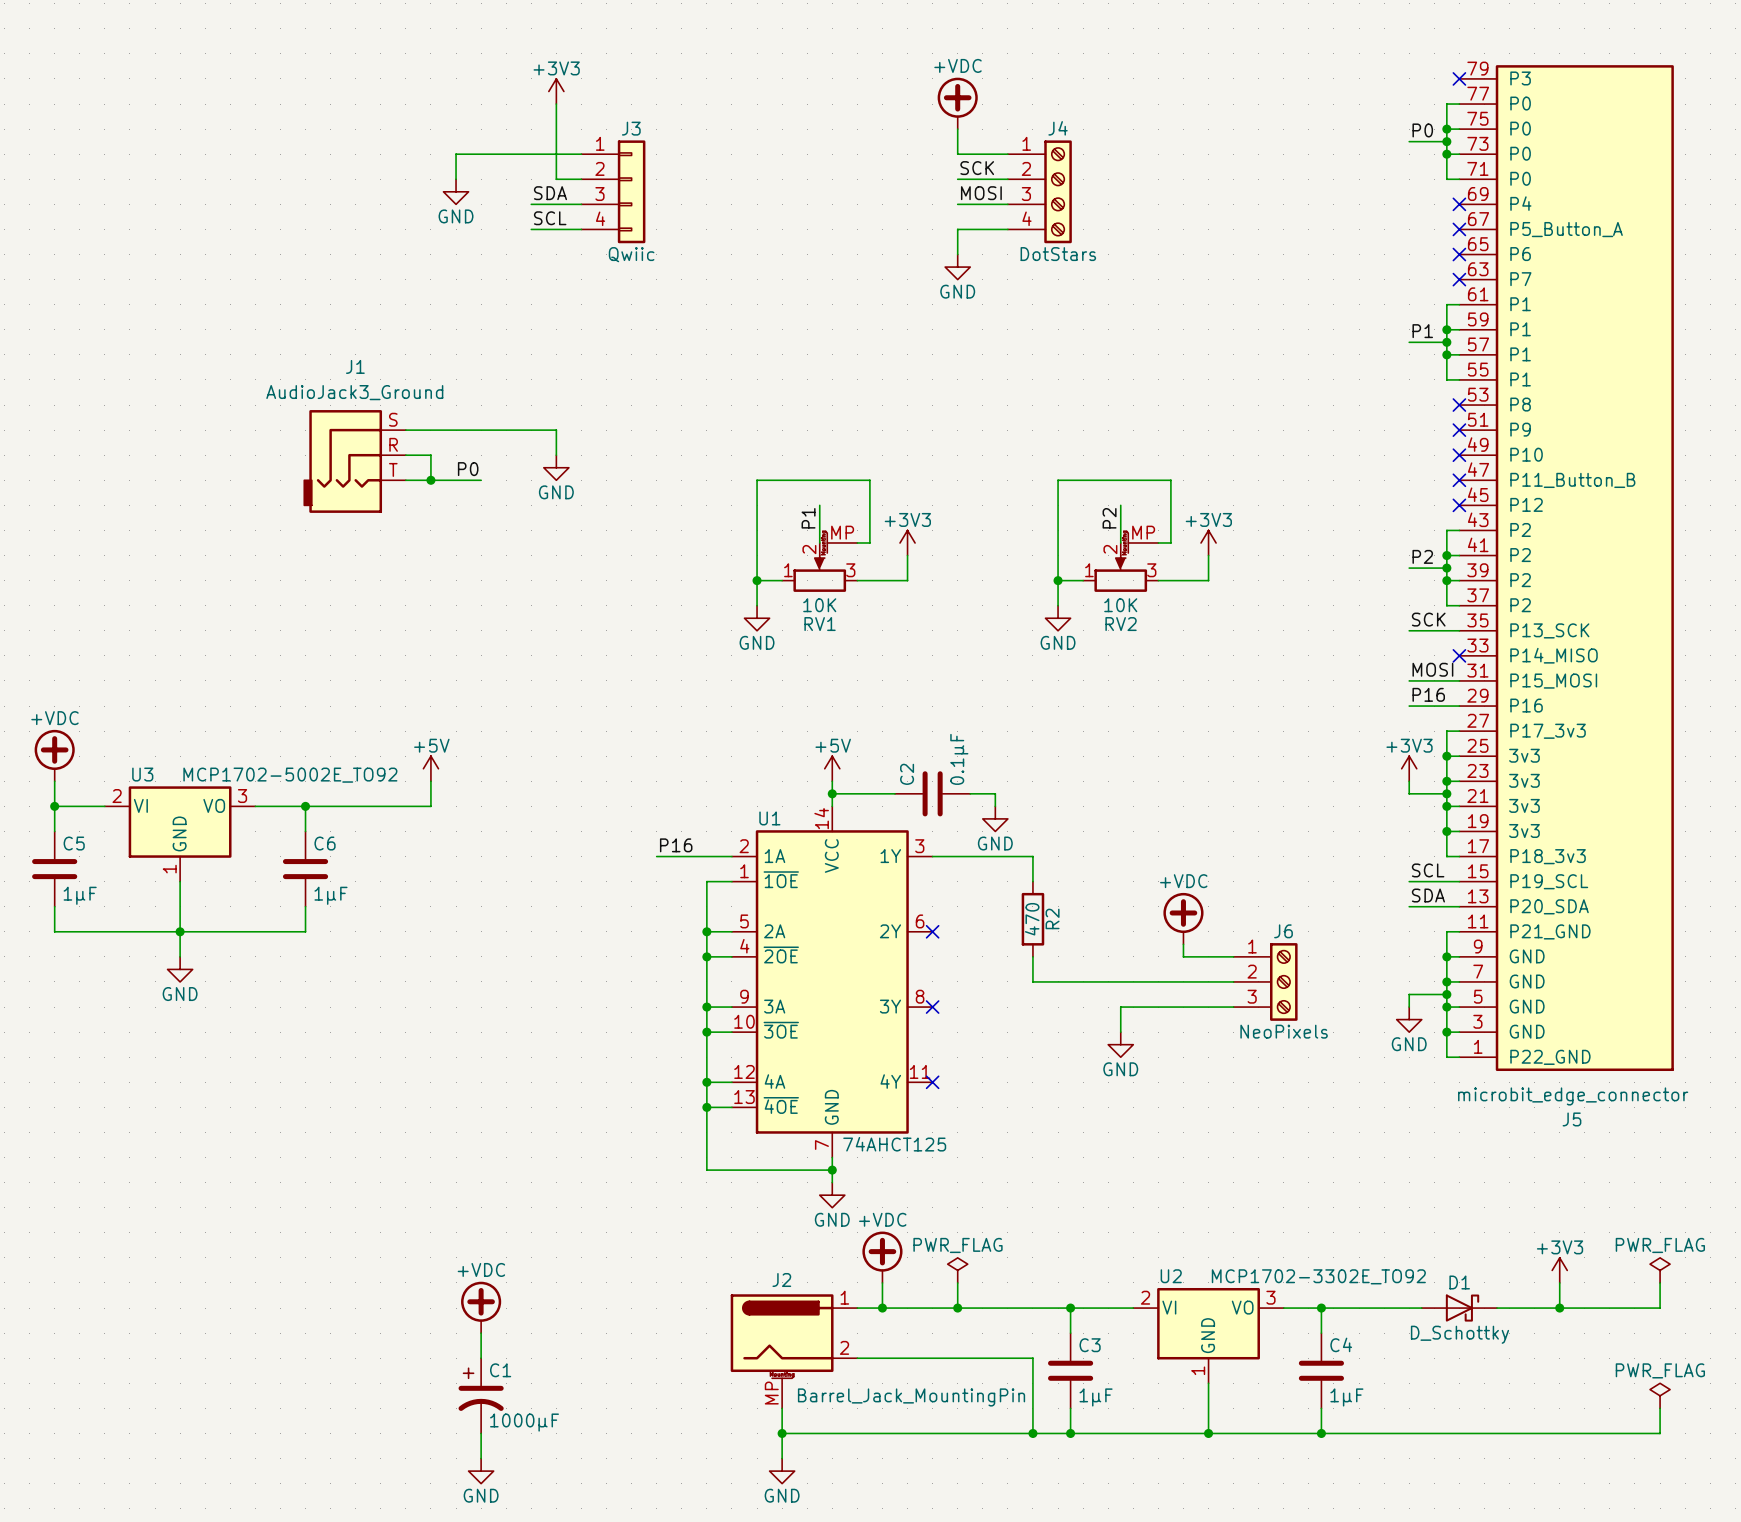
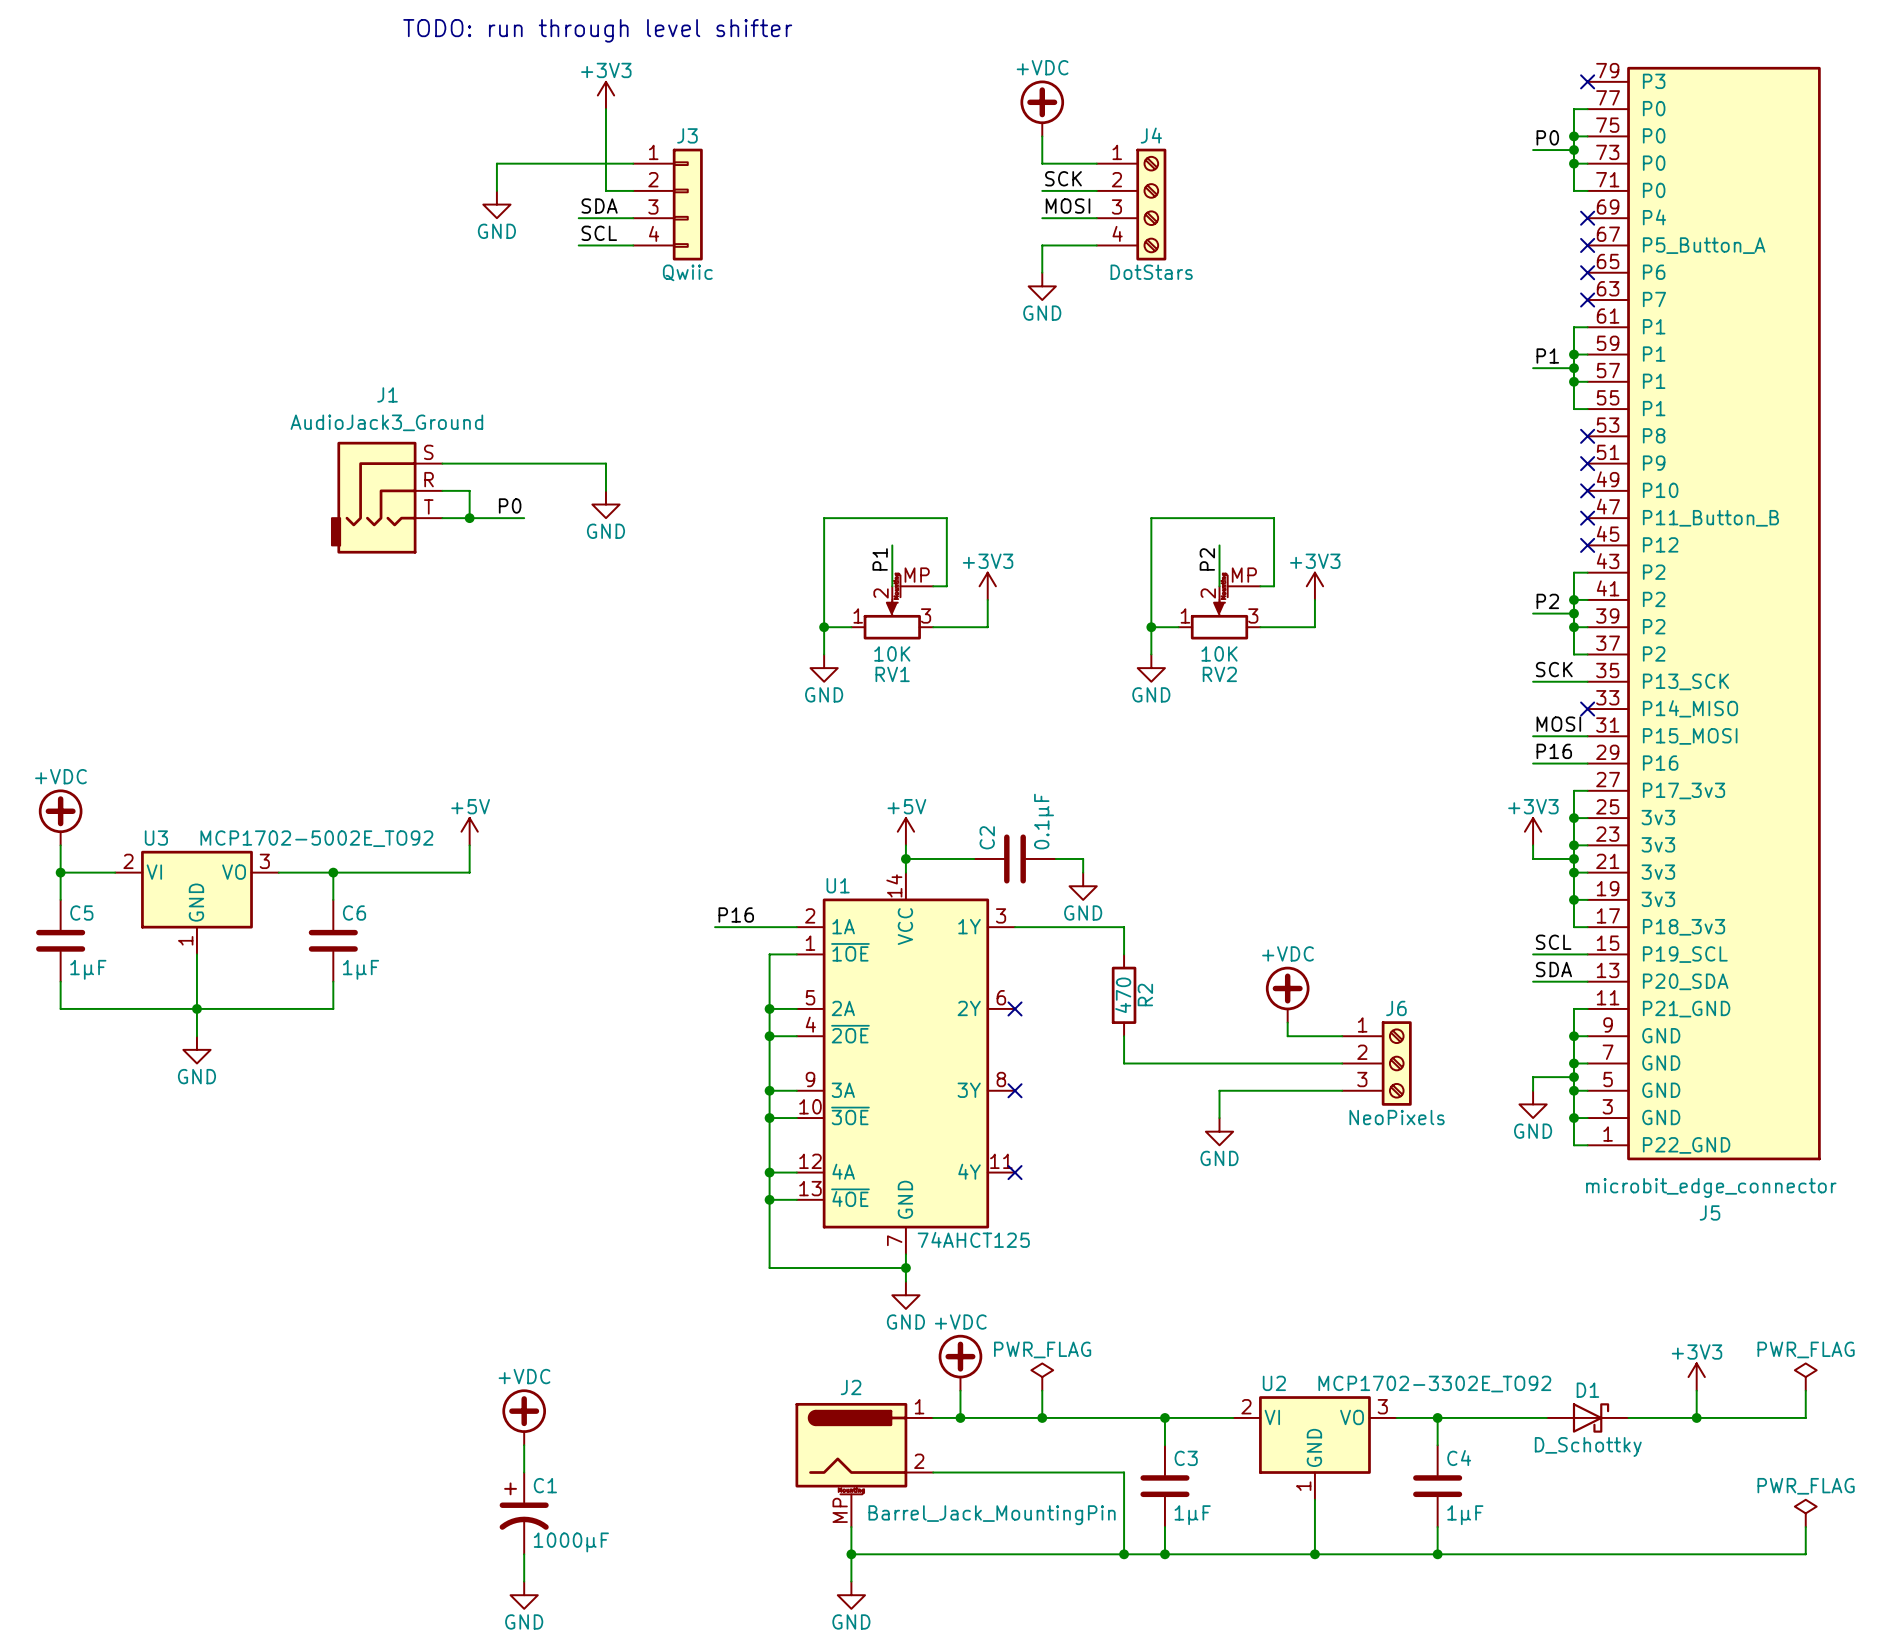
text: none -> TODO: run through level shifter (597, 30)

